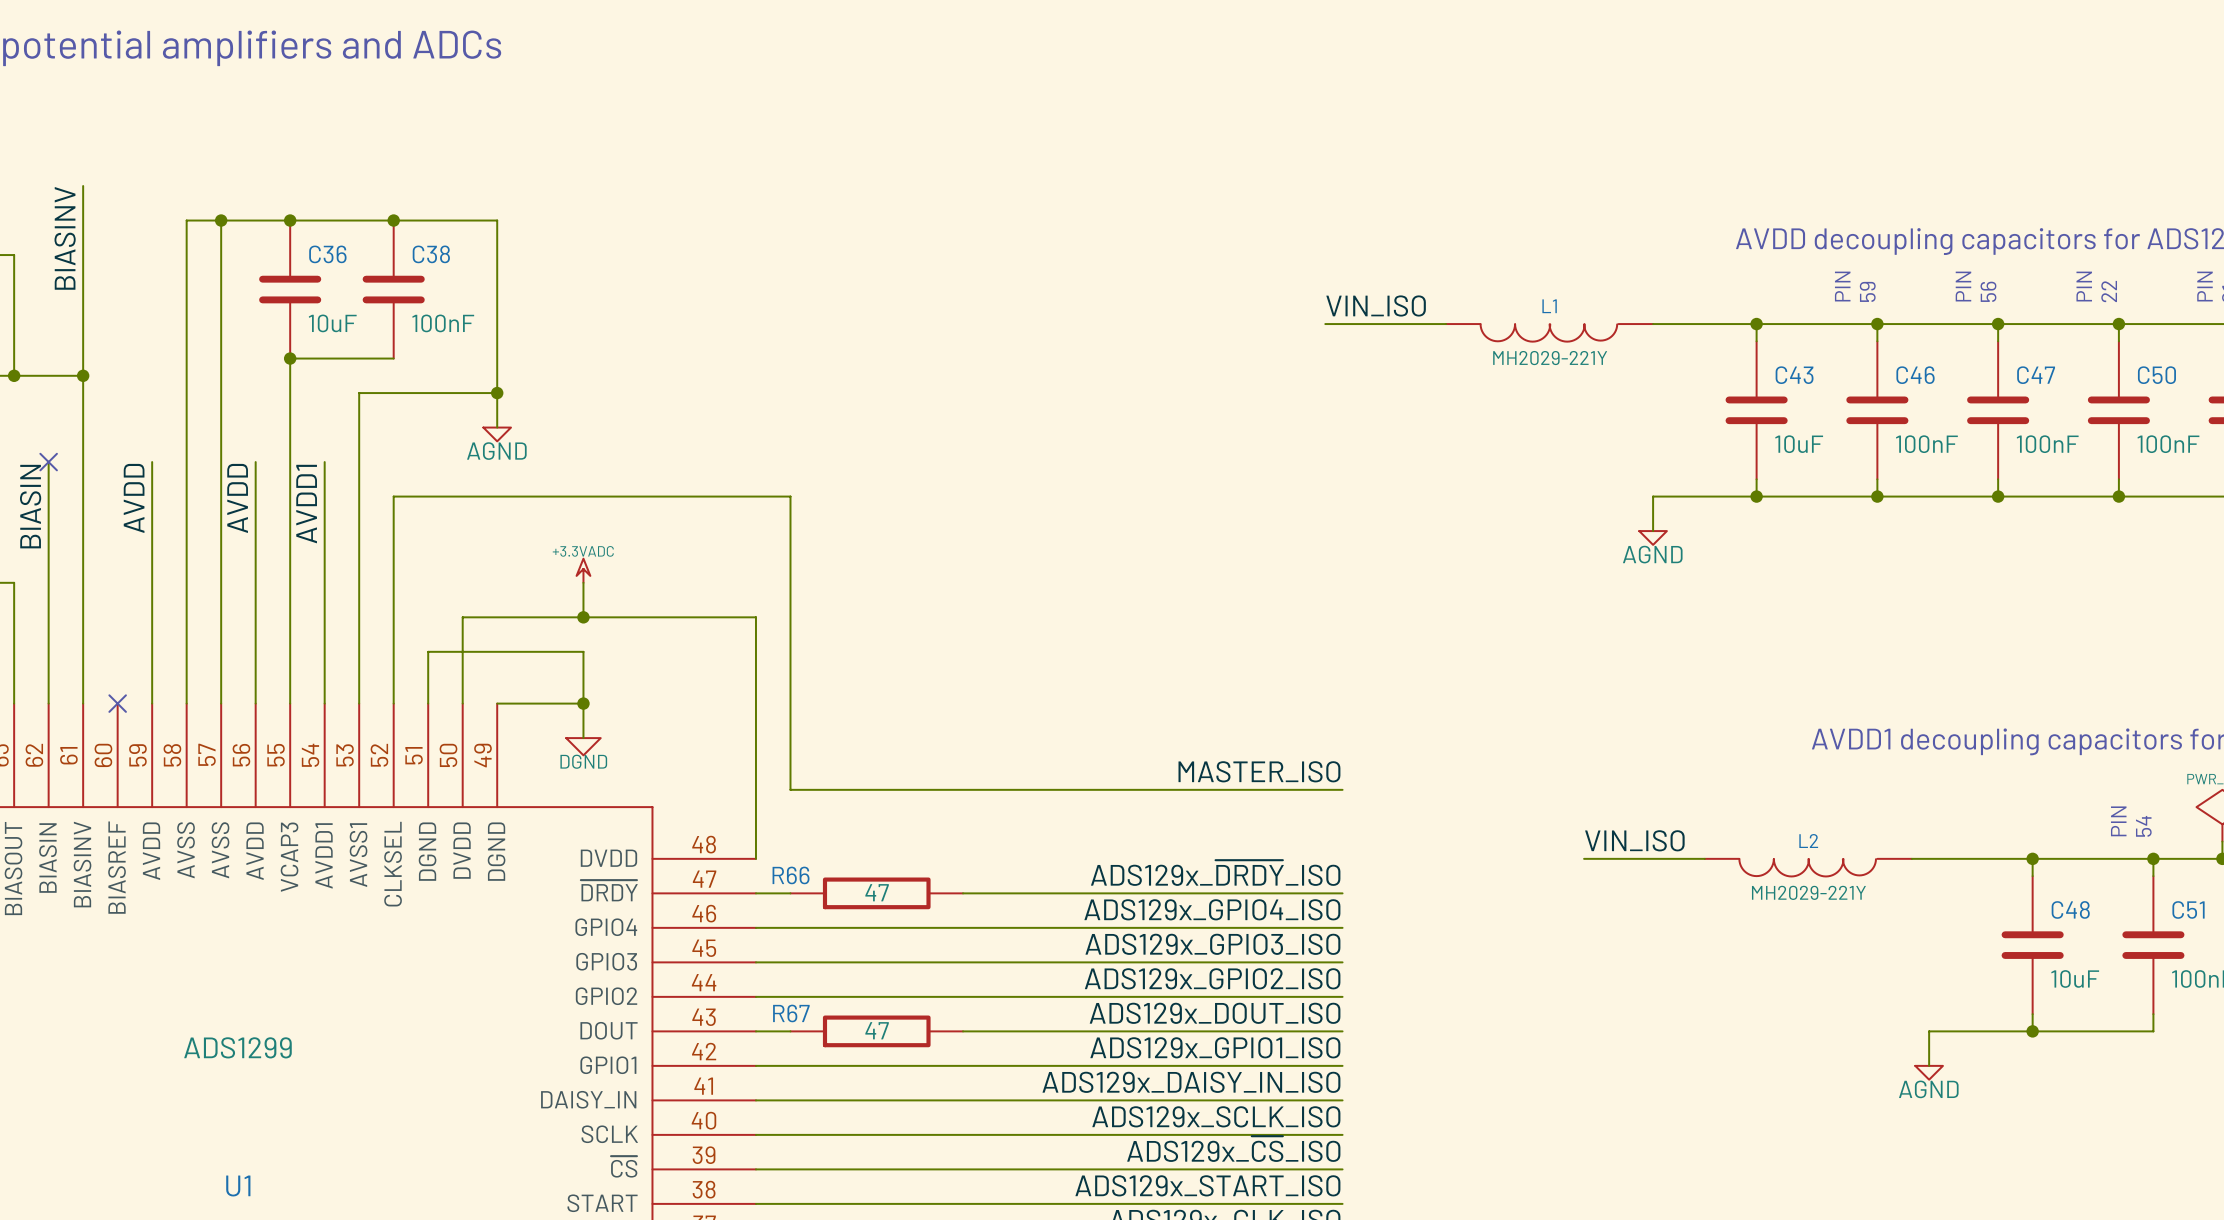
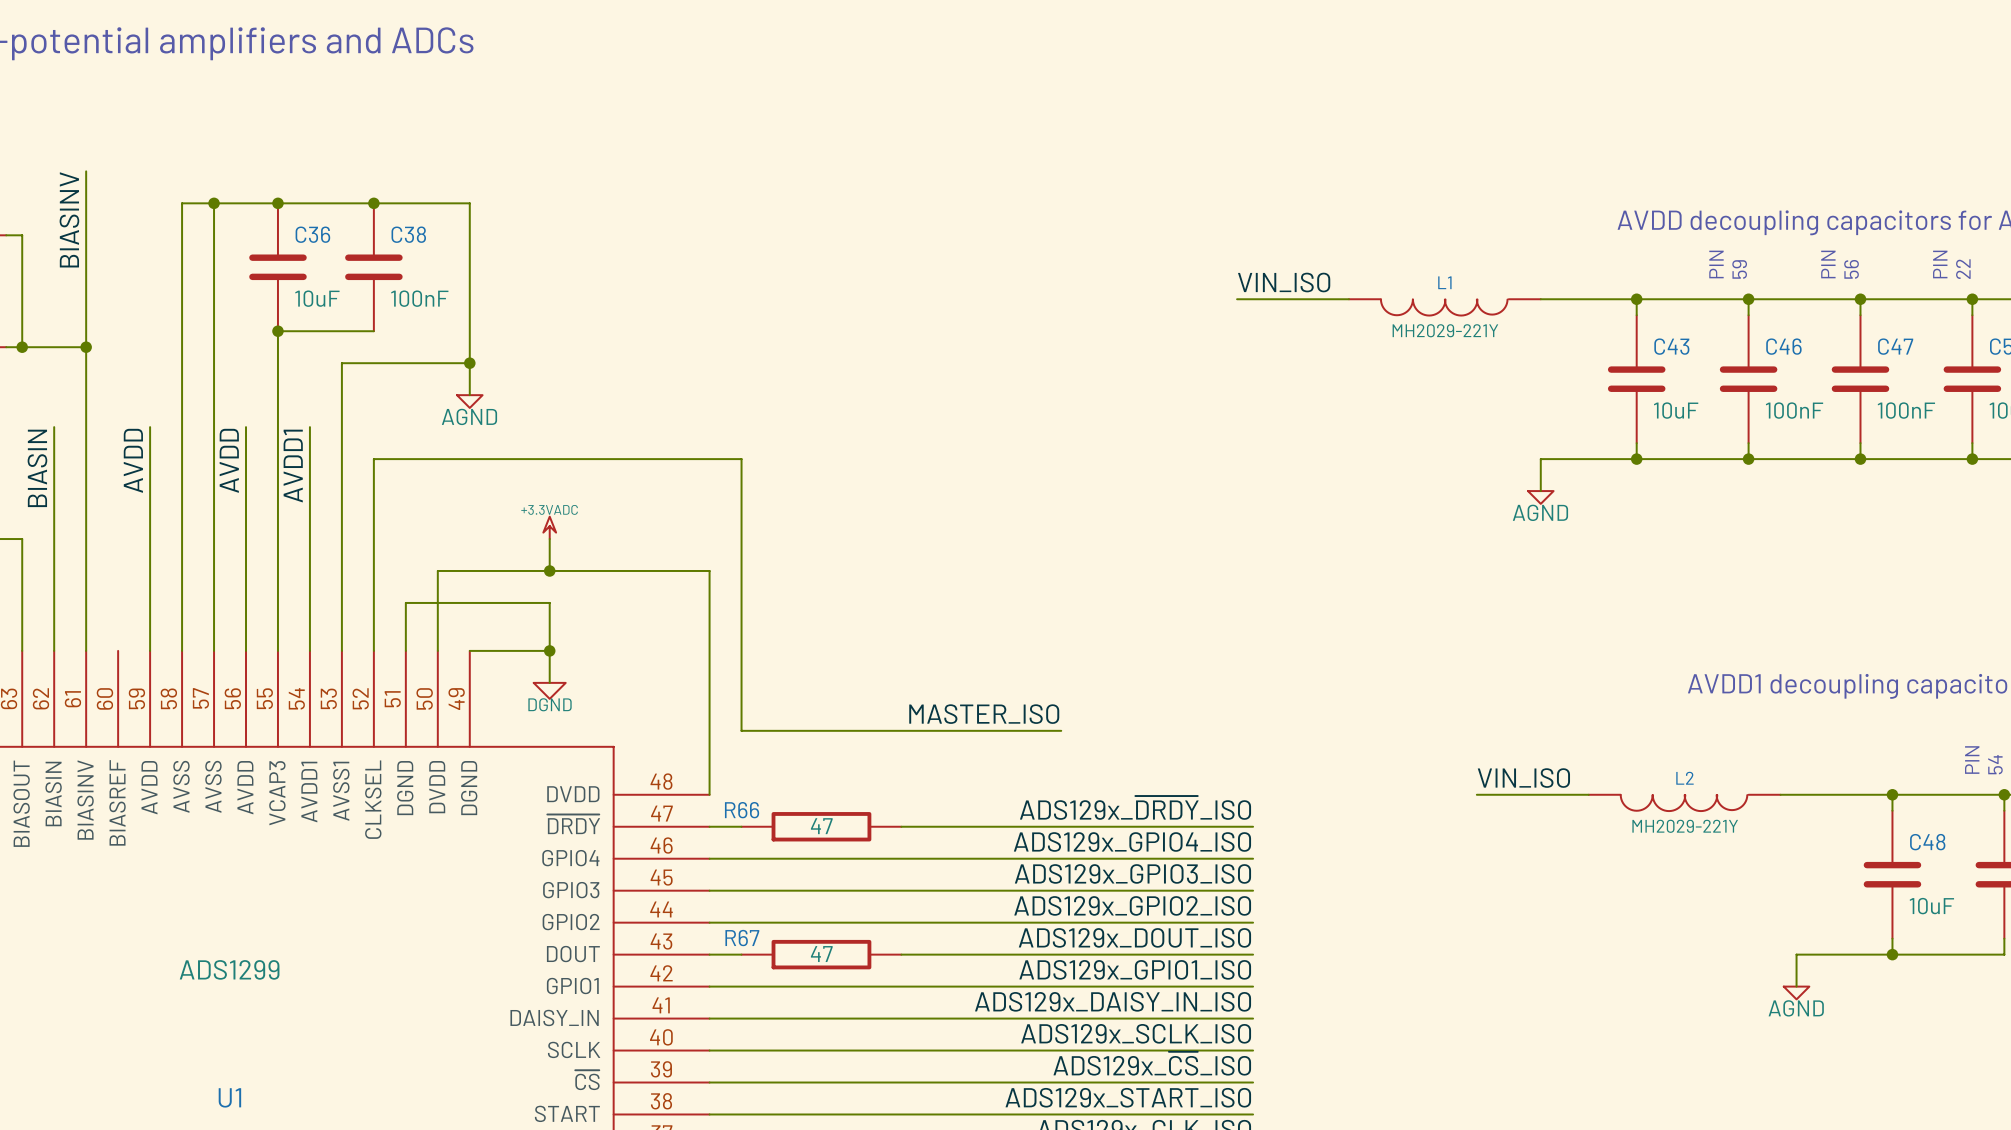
no-connect mark: (48, 462) -> none
no-connect mark: (117, 703) -> none
label position: MASTER_ISO (1259, 771) -> MASTER_ISO (984, 714)
wire: (1135, 789) (1342, 789) -> none

